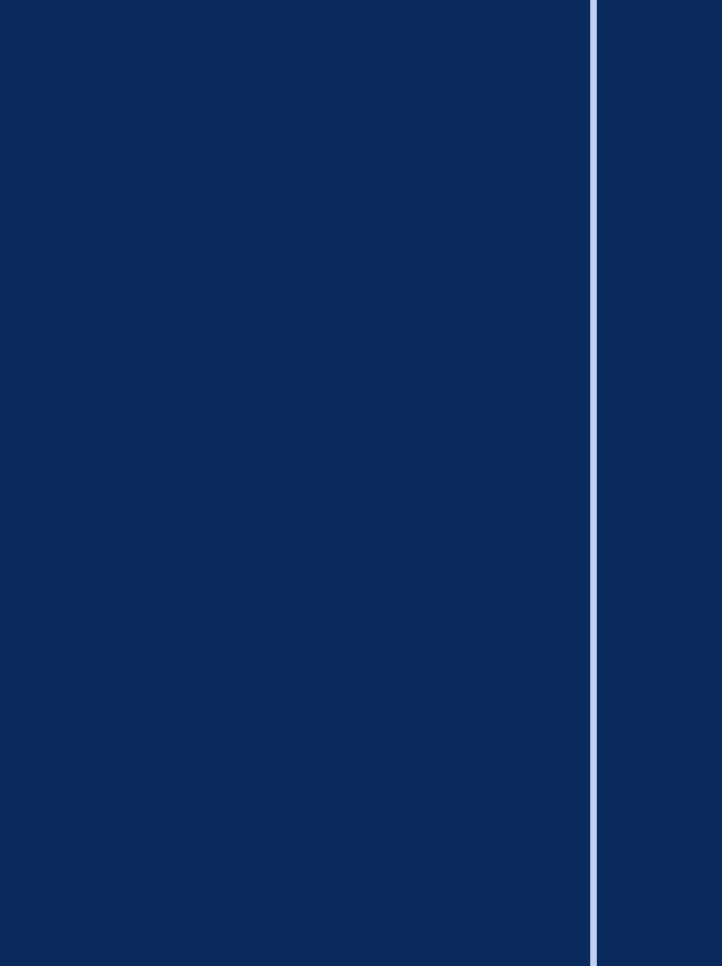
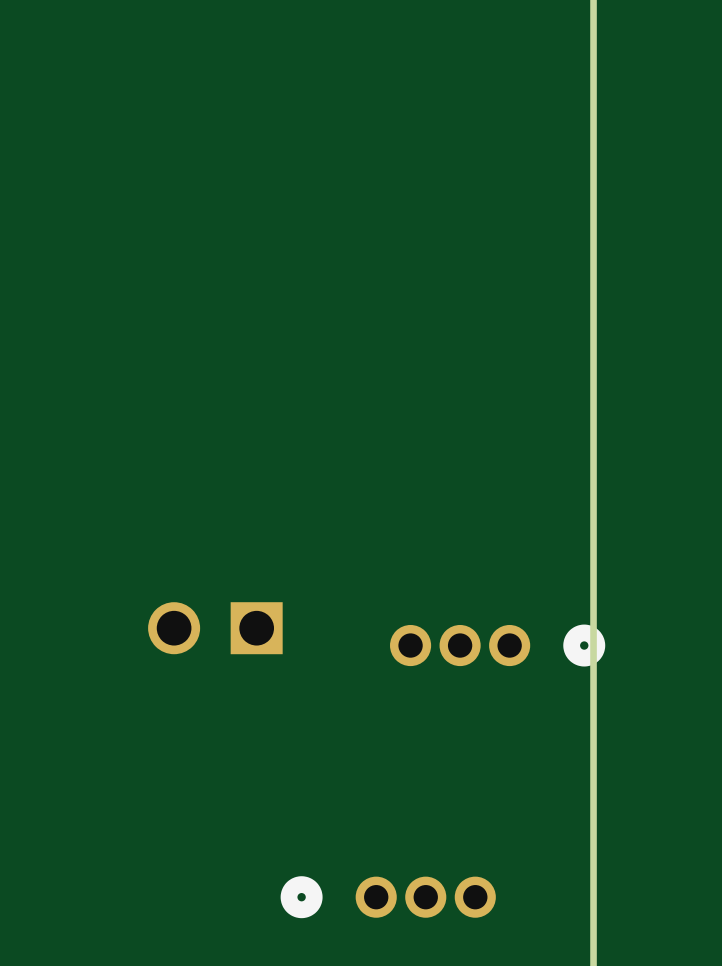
part: none -> (215, 628)
part: none -> (497, 645)
part: none -> (388, 897)

